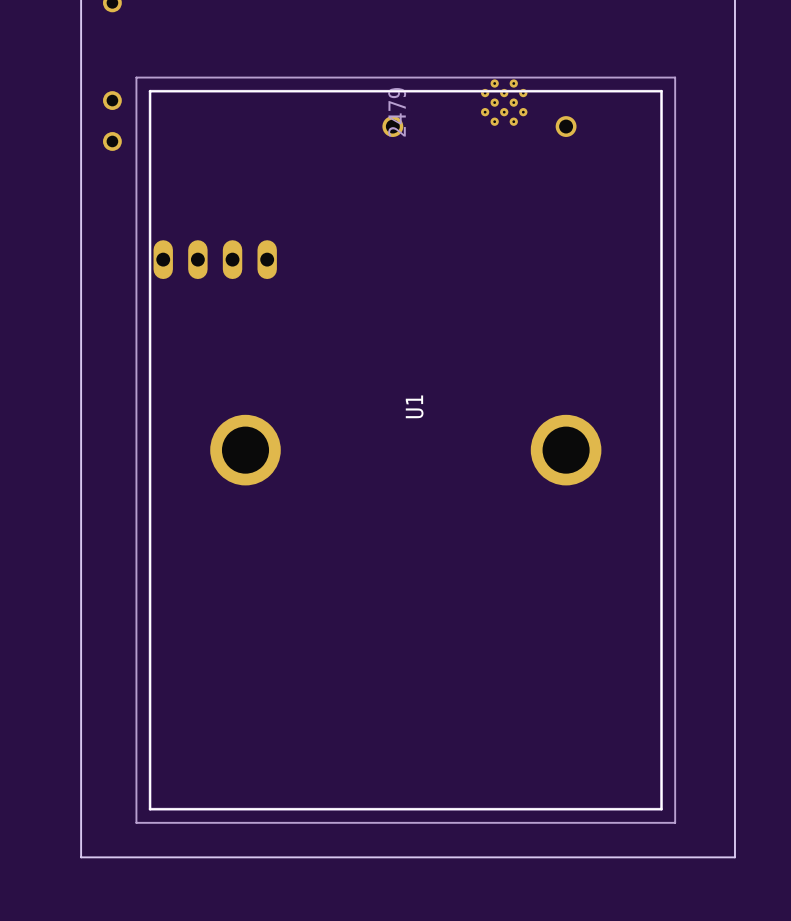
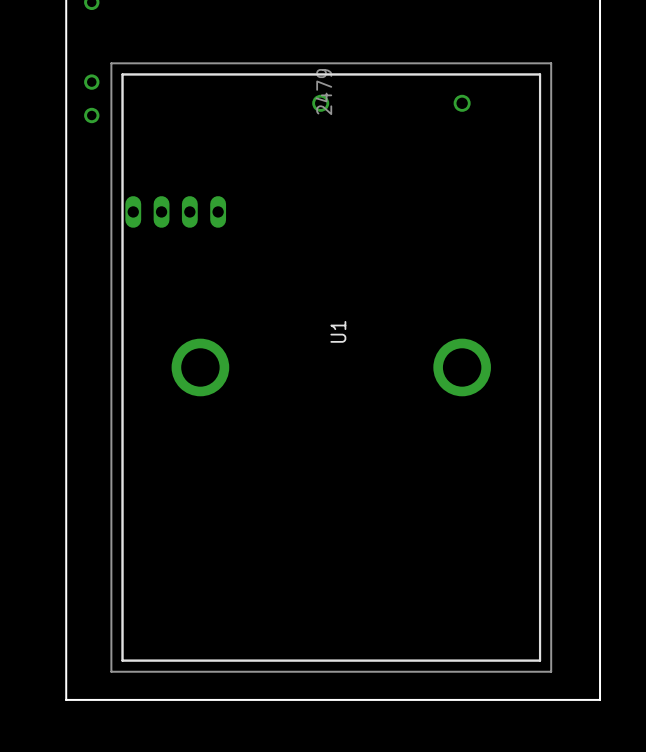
part: (504, 102) -> none

